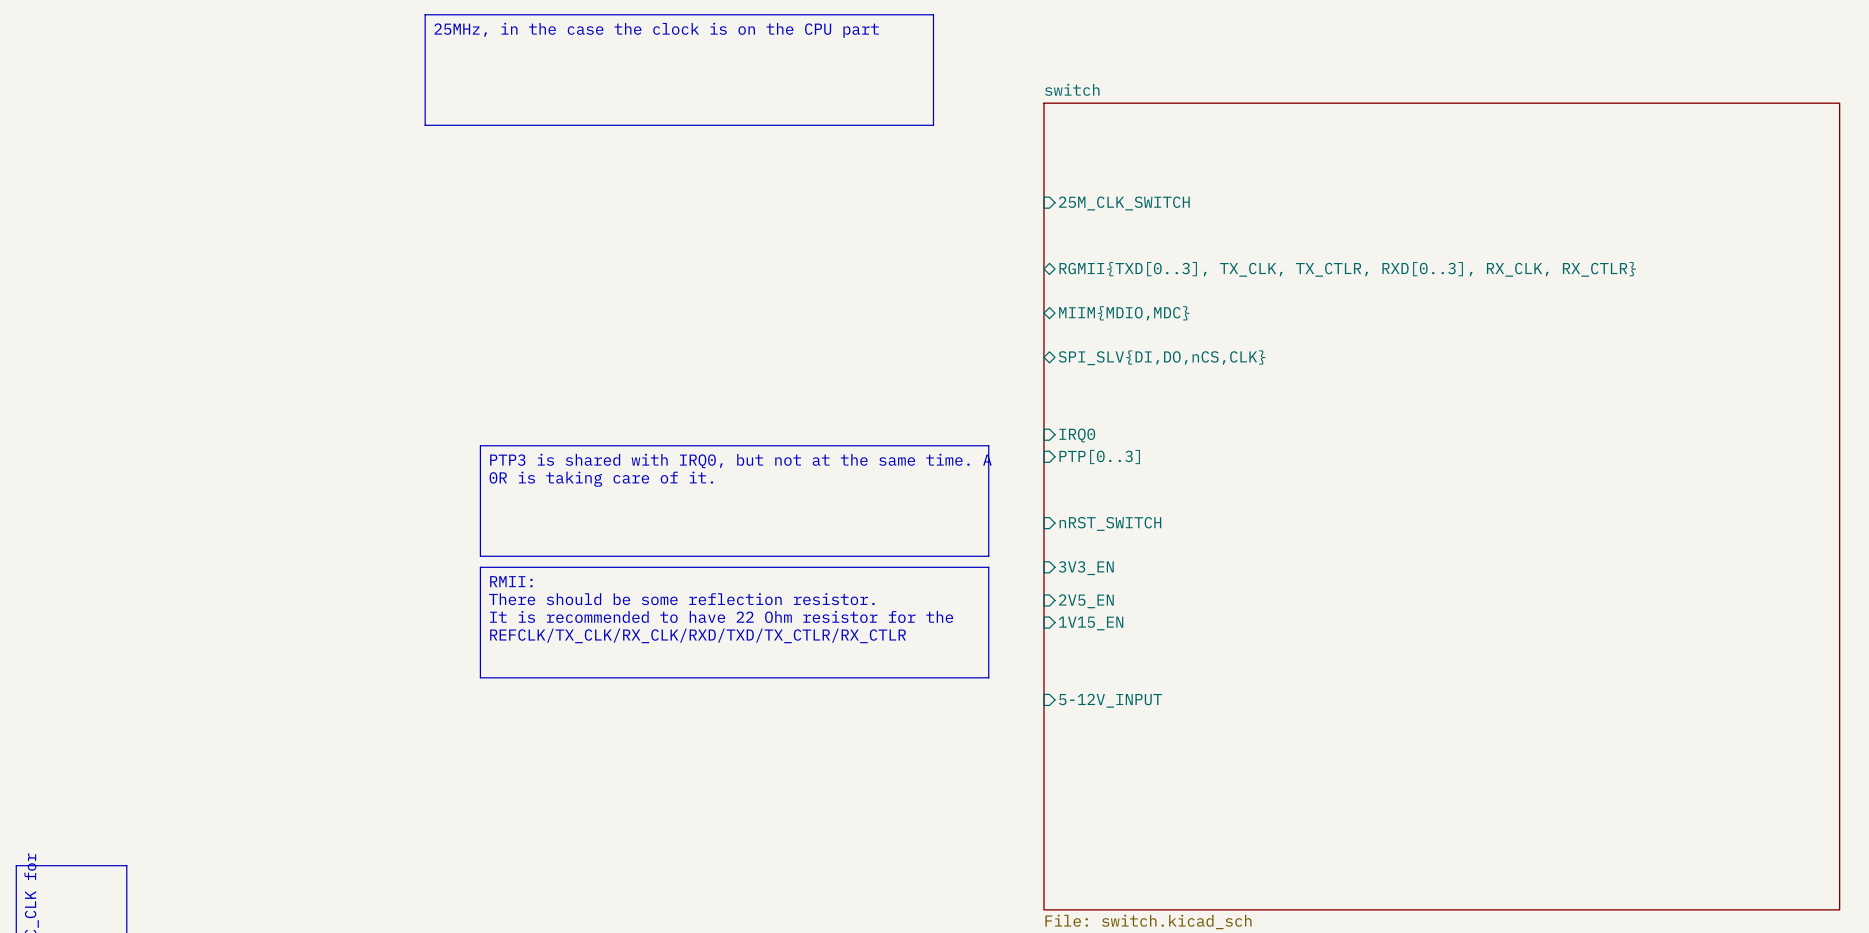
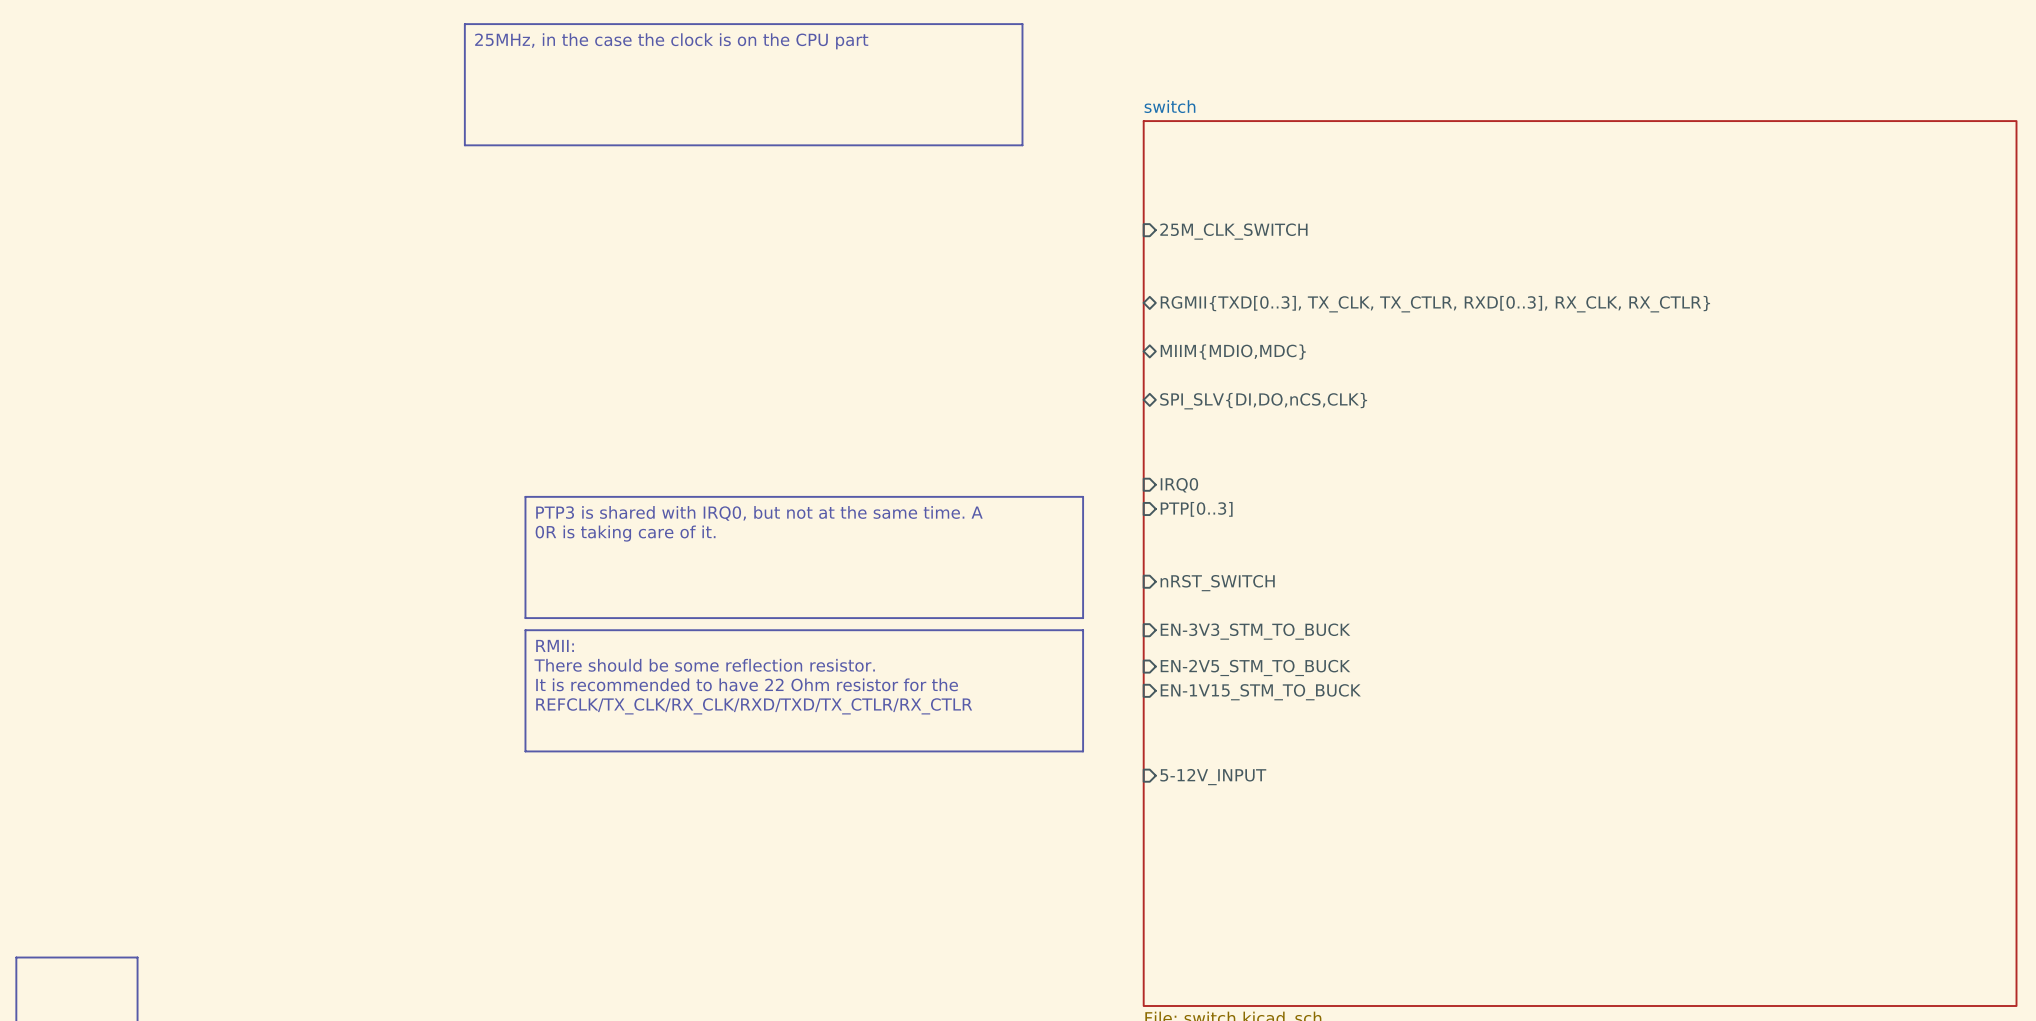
sheet pin: 3V3_EN (1086, 568) -> EN-3V3_STM_TO_BUCK (1255, 631)
sheet pin: 2V5_EN (1086, 601) -> EN-2V5_STM_TO_BUCK (1255, 667)
sheet pin: 1V15_EN (1091, 623) -> EN-1V15_STM_TO_BUCK (1260, 692)

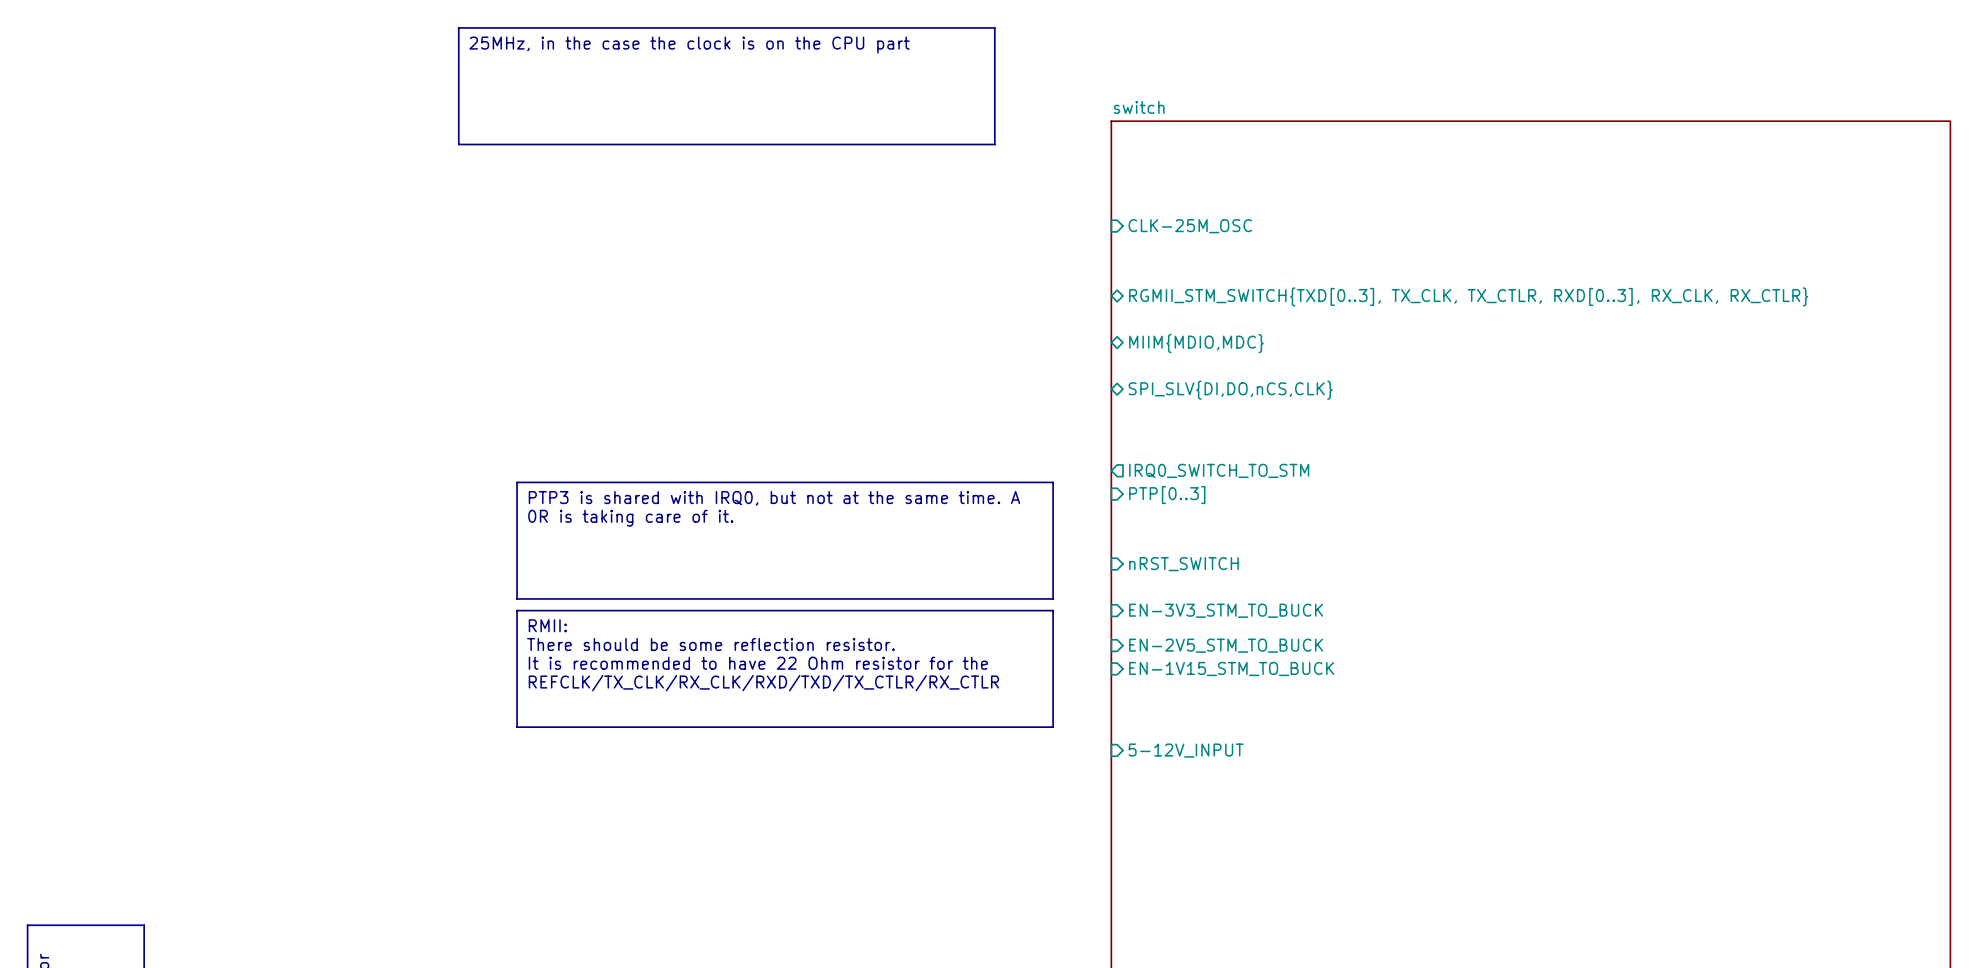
sheet pin: 25M_CLK_SWITCH (1233, 231) -> CLK-25M_OSC (1190, 226)
sheet pin: RGMII{TXD[0..3], TX_CLK, TX_CTLR, RXD[0..3], RX_CLK, RX_CTLR} (1435, 304) -> RGMII_STM_SWITCH{TXD[0..3], TX_CLK, TX_CTLR, RXD[0..3], RX_CLK, RX_CTLR} (1468, 296)
sheet pin shape: input (1179, 485) -> output (1219, 470)
sheet pin: IRQ0 (1179, 485) -> IRQ0_SWITCH_TO_STM (1219, 470)

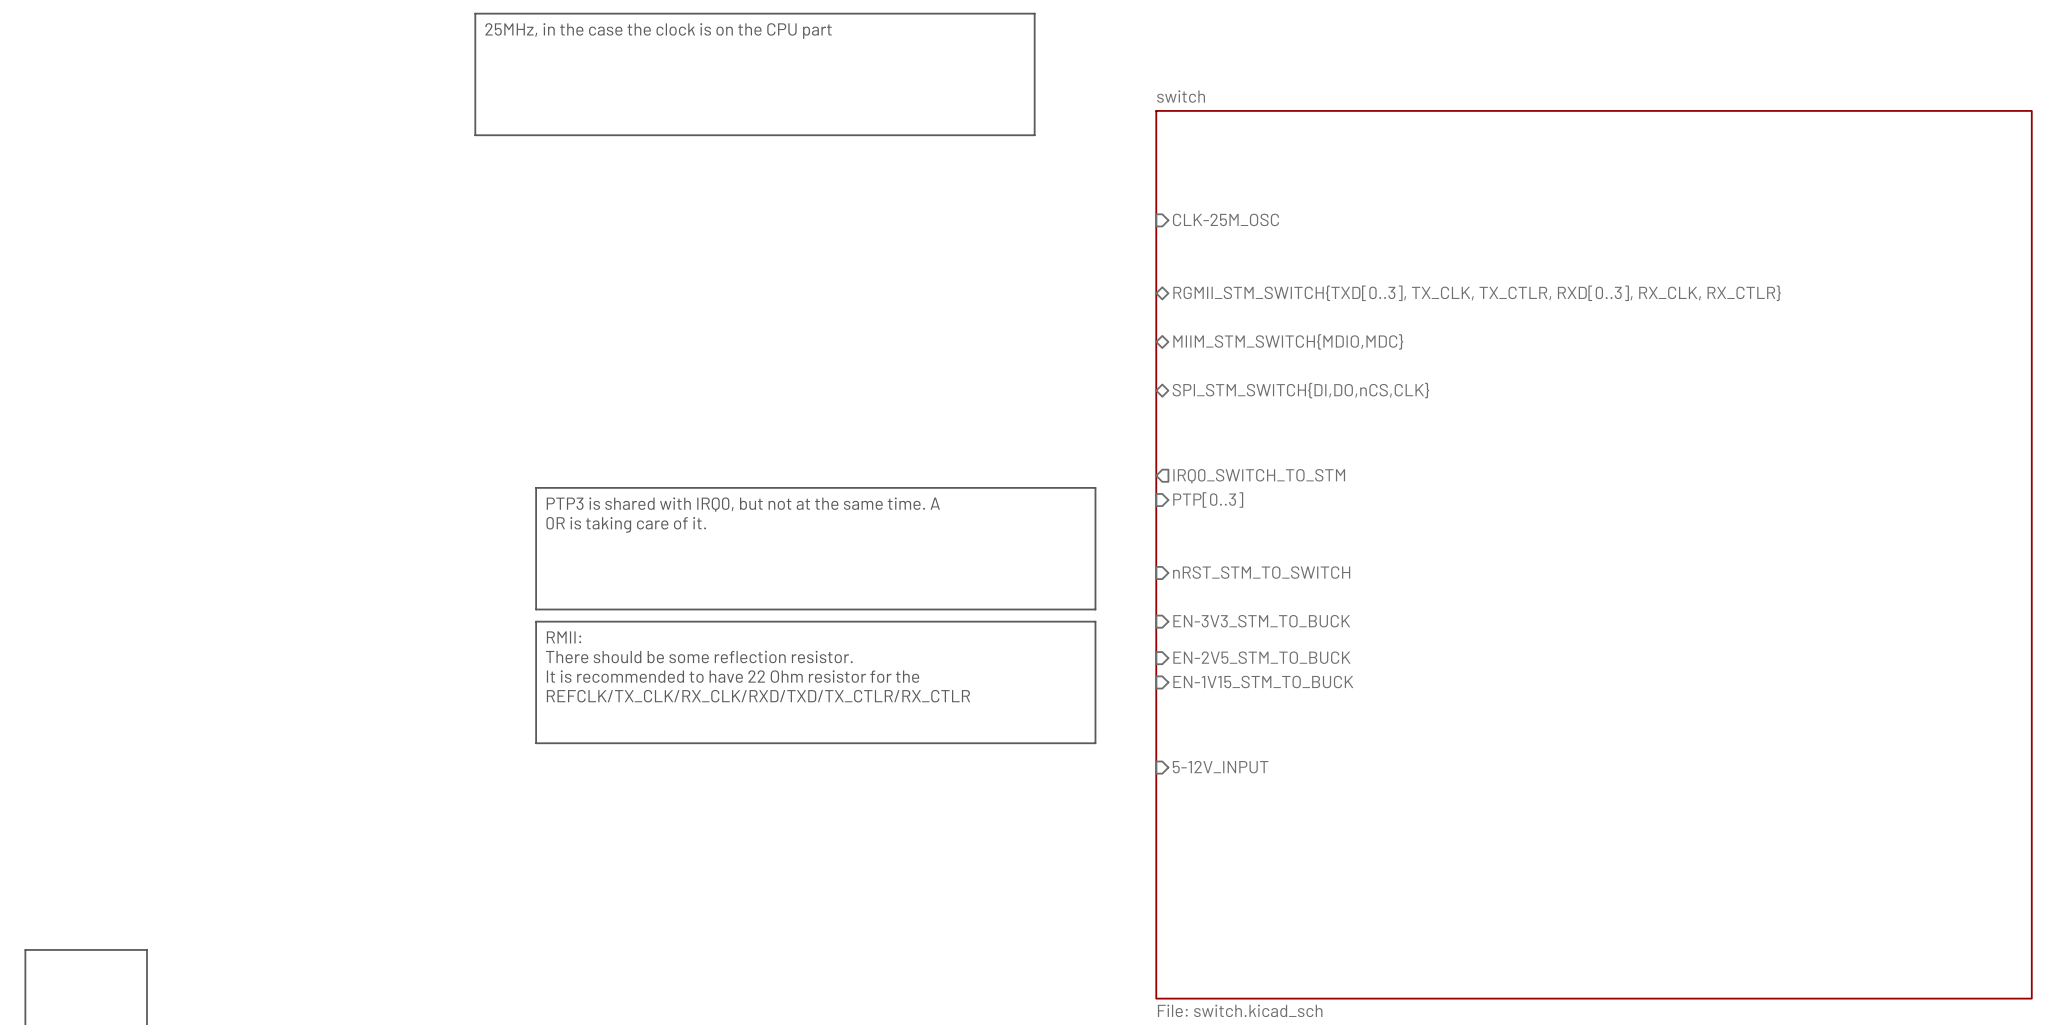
sheet pin: MIIM{MDIO,MDC} (1196, 343) -> MIIM_STM_SWITCH{MDIO,MDC} (1288, 341)
sheet pin: SPI_SLV{DI,DO,nCS,CLK} (1230, 390) -> SPI_STM_SWITCH{DI,DO,nCS,CLK} (1300, 390)
sheet pin: nRST_SWITCH (1183, 564) -> nRST_STM_TO_SWITCH (1261, 572)

